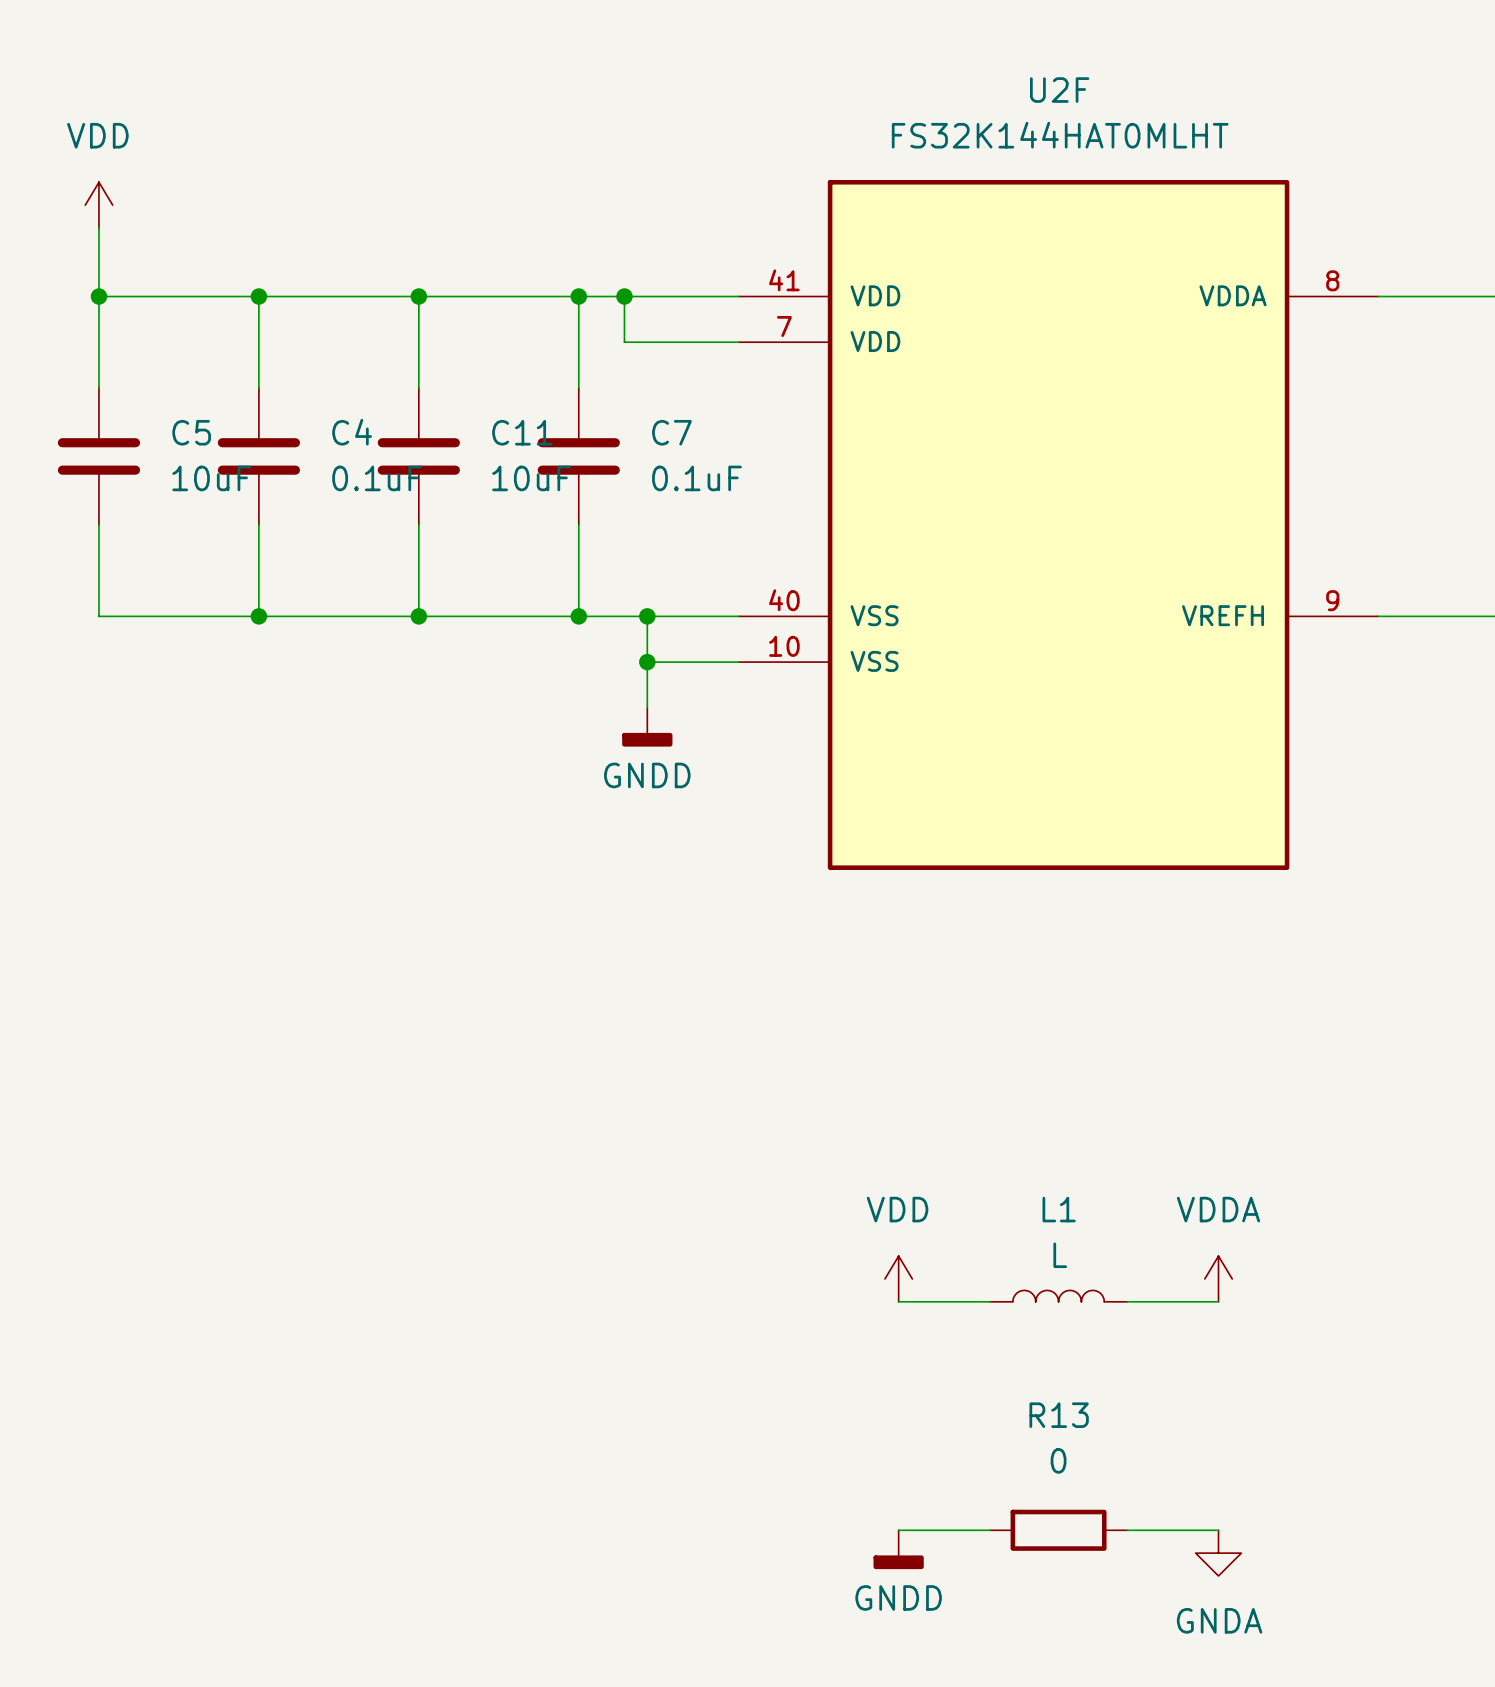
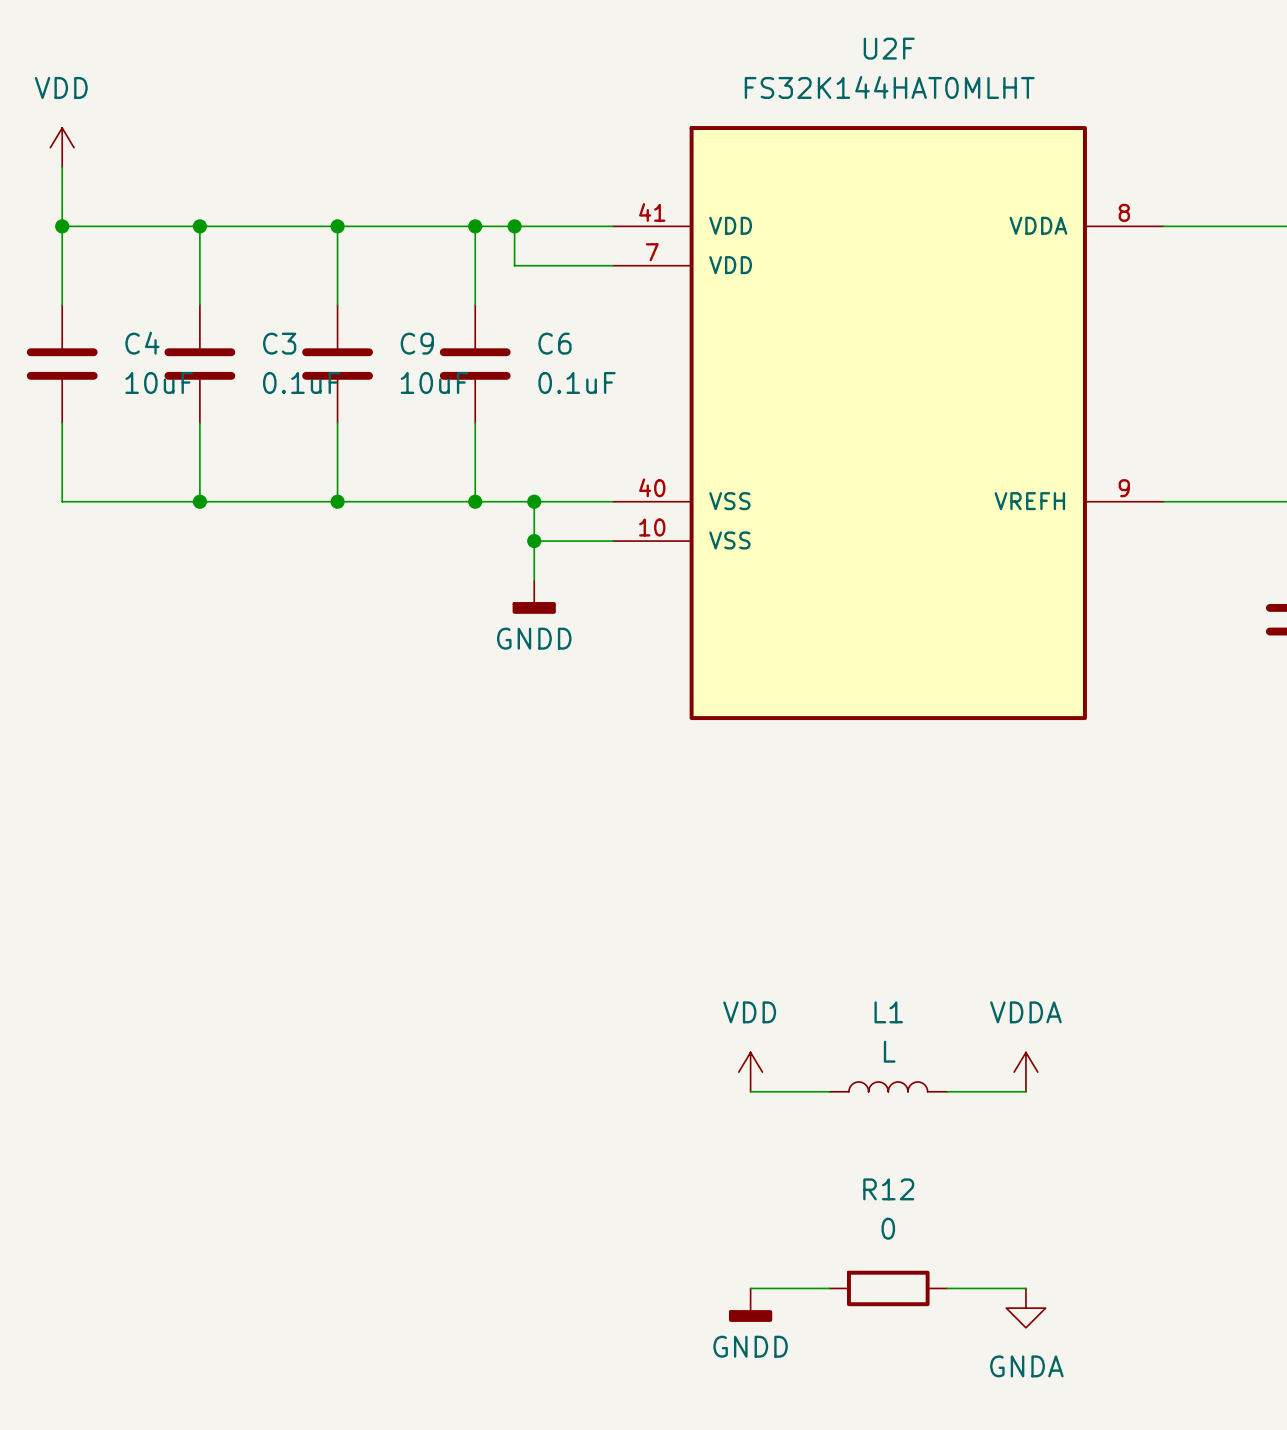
C5 name: C5 (191, 432) -> C4 (142, 343)
C4 name: C4 (352, 432) -> C3 (279, 343)
C11 name: C11 (522, 432) -> C9 (417, 343)
C7 name: C7 (671, 432) -> C6 (555, 343)
R13 name: R13 (1059, 1415) -> R12 (888, 1189)

